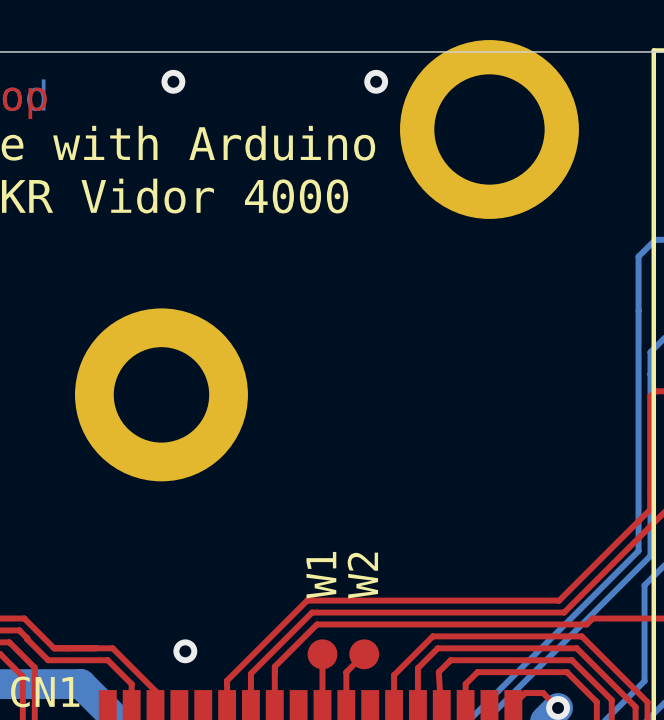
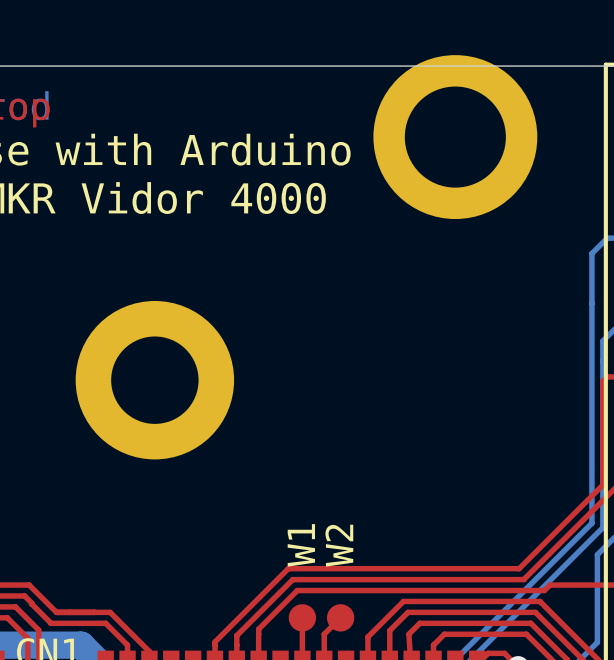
via: (173, 81) -> none
via: (376, 81) -> none
via: (185, 651) -> none

